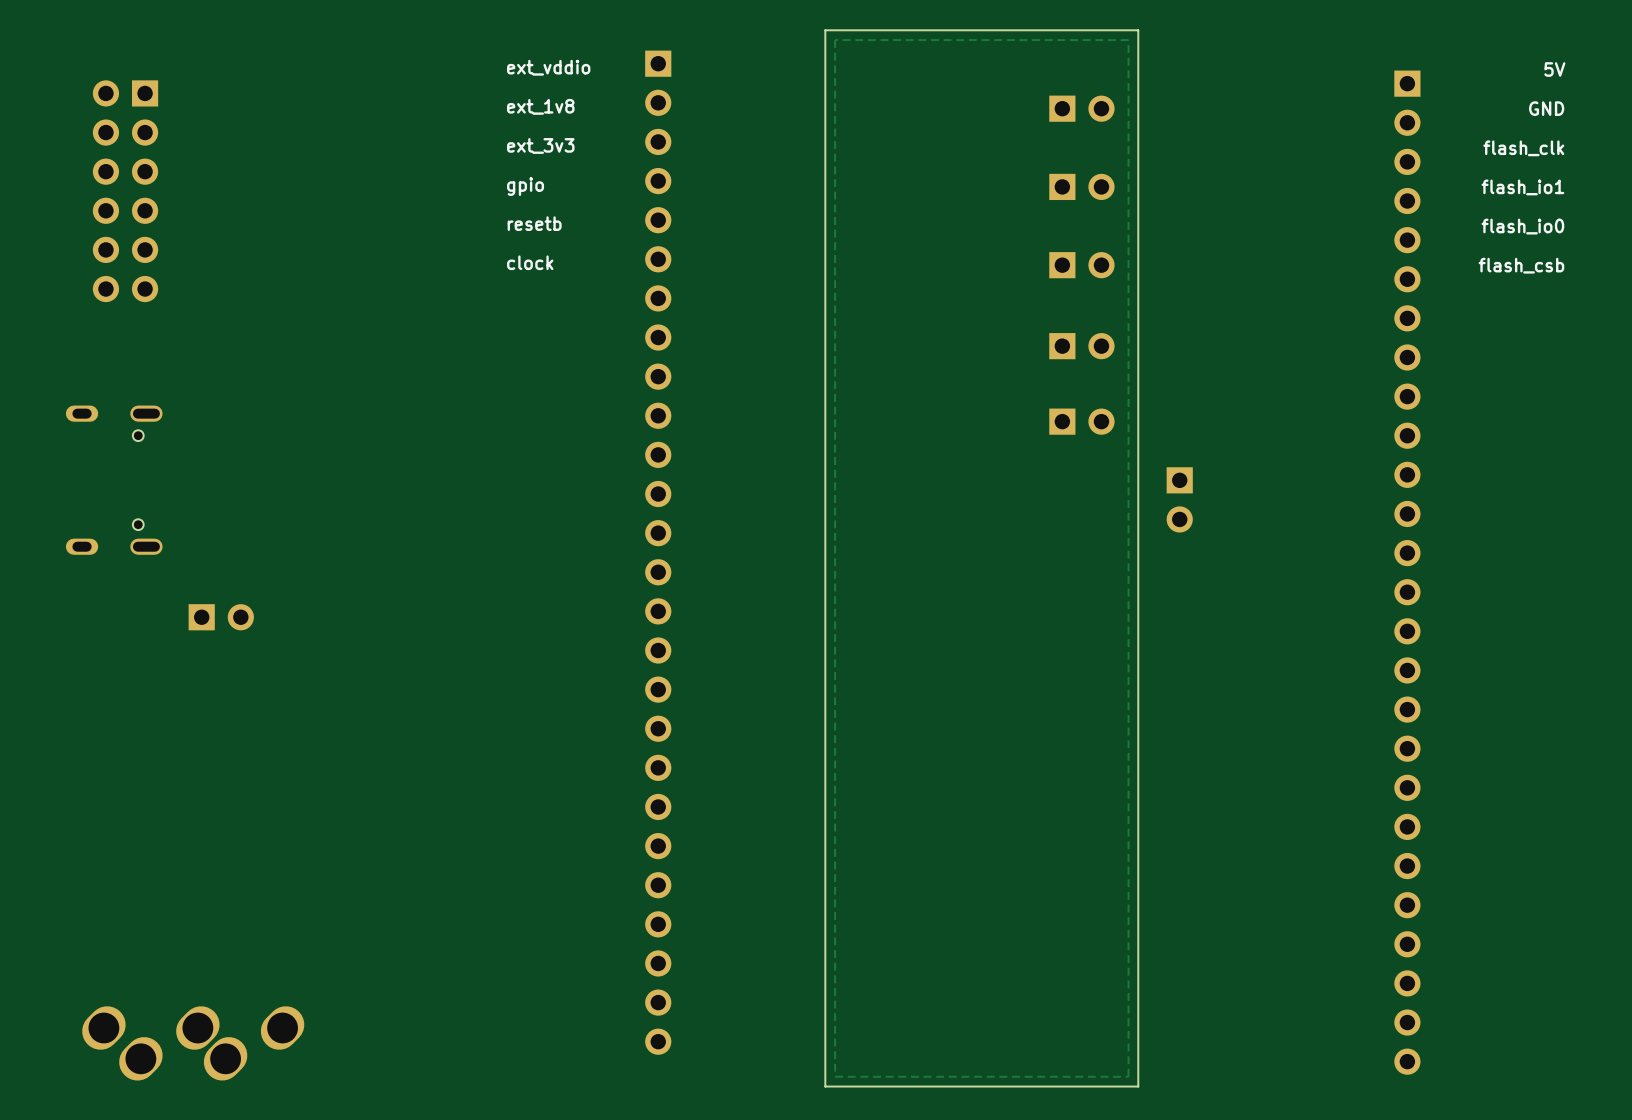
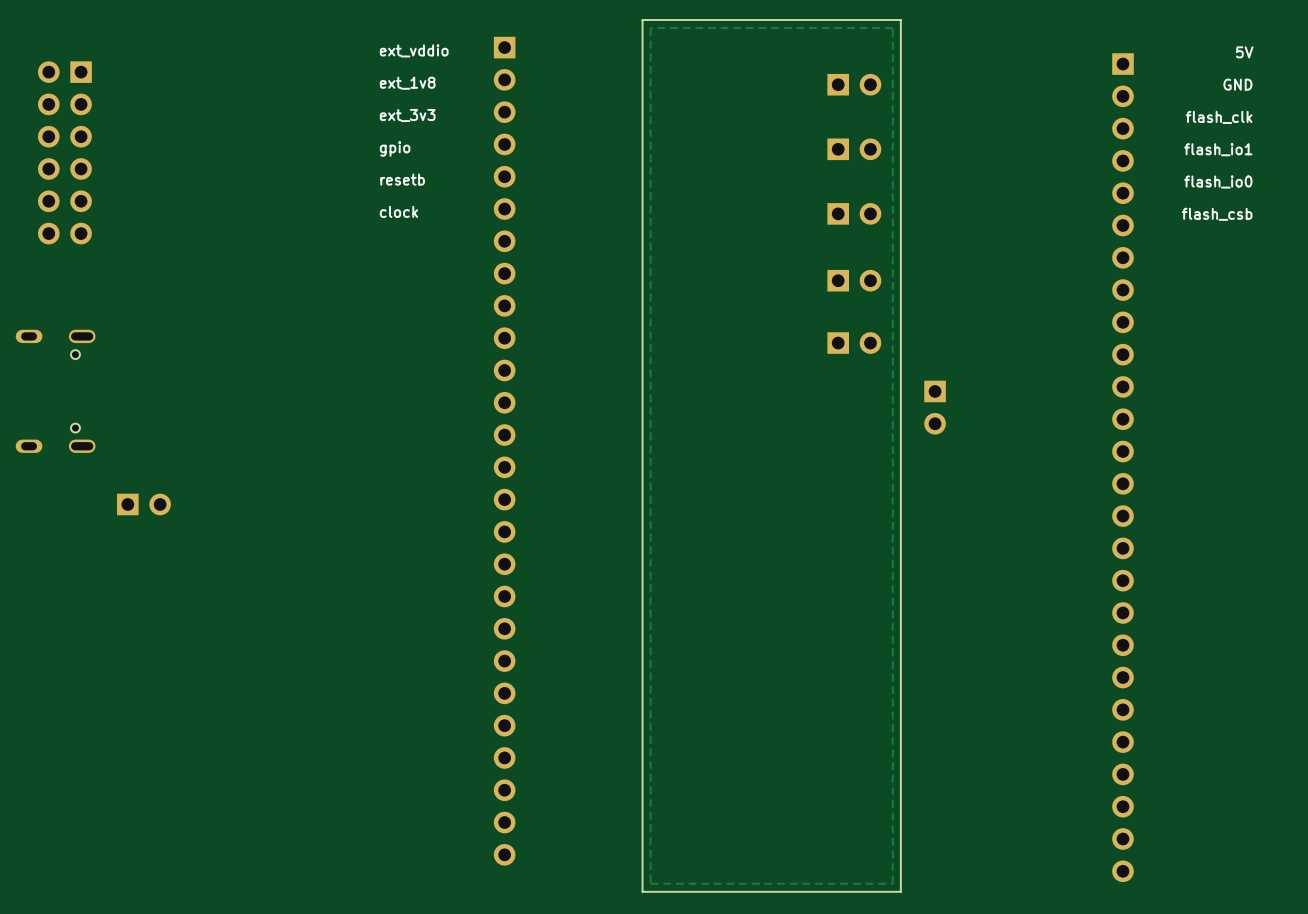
part: (193, 1043) -> none

